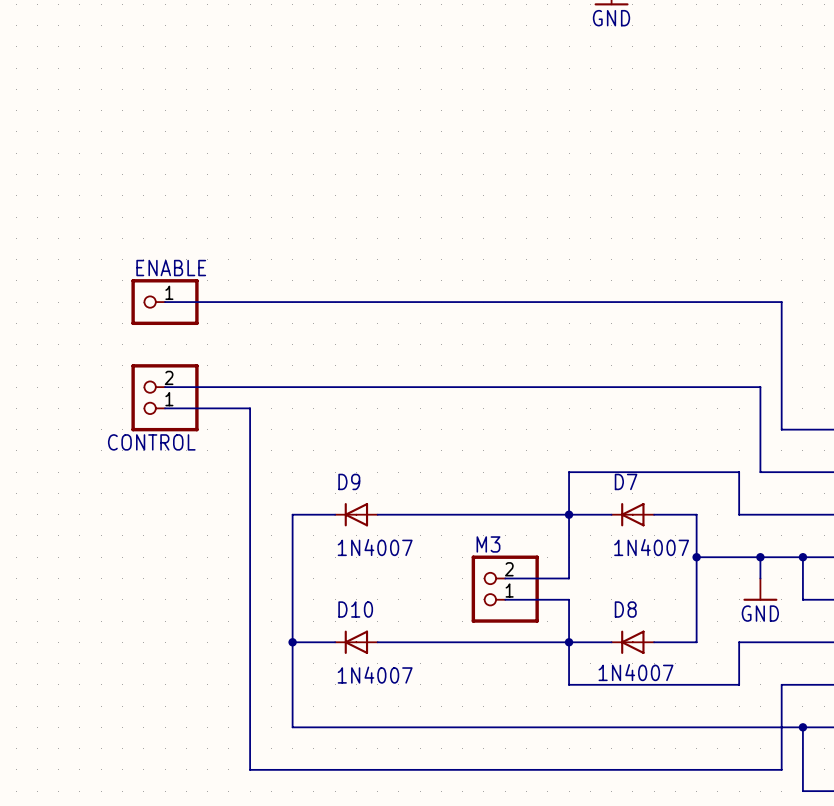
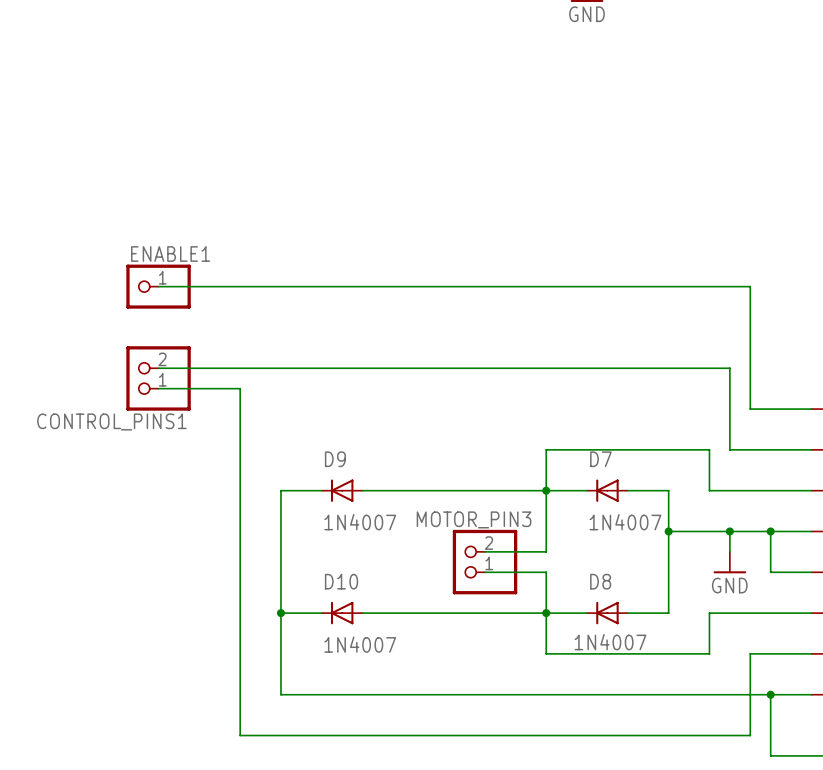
ENABLE name: ENABLE (171, 268) -> ENABLE1 (170, 253)
CONTROL name: CONTROL (151, 442) -> CONTROL_PINS1 (111, 421)
M3 name: M3 (488, 544) -> MOTOR_PIN3 (474, 519)

